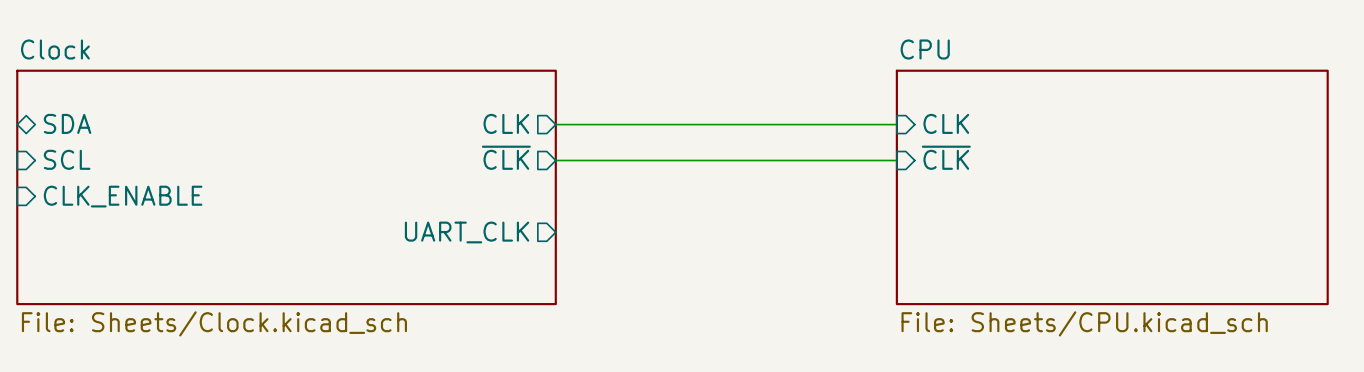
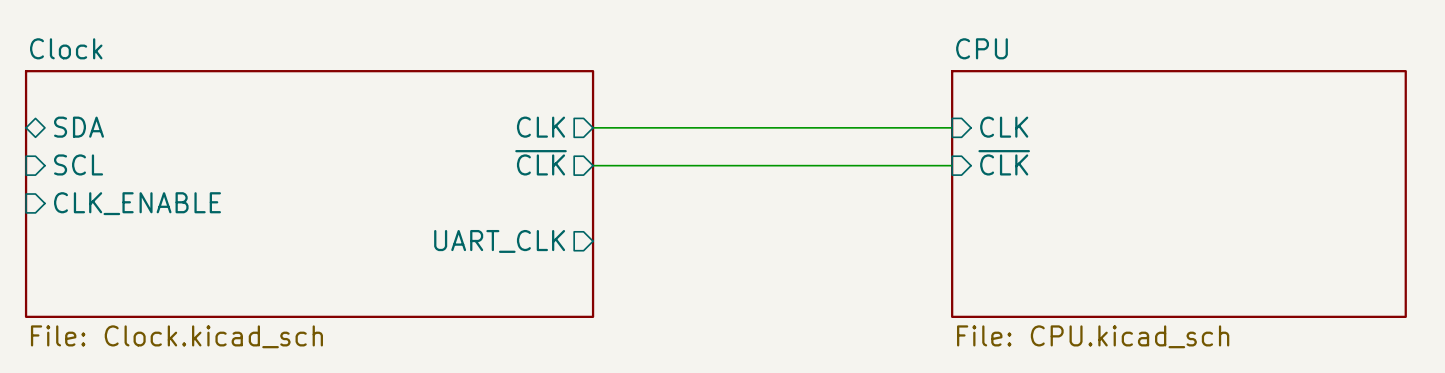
sheet Clock value: File: Sheets/Clock.kicad_sch (214, 323) -> File: Clock.kicad_sch (176, 336)
sheet CPU value: File: Sheets/CPU.kicad_sch (1084, 323) -> File: CPU.kicad_sch (1093, 336)

